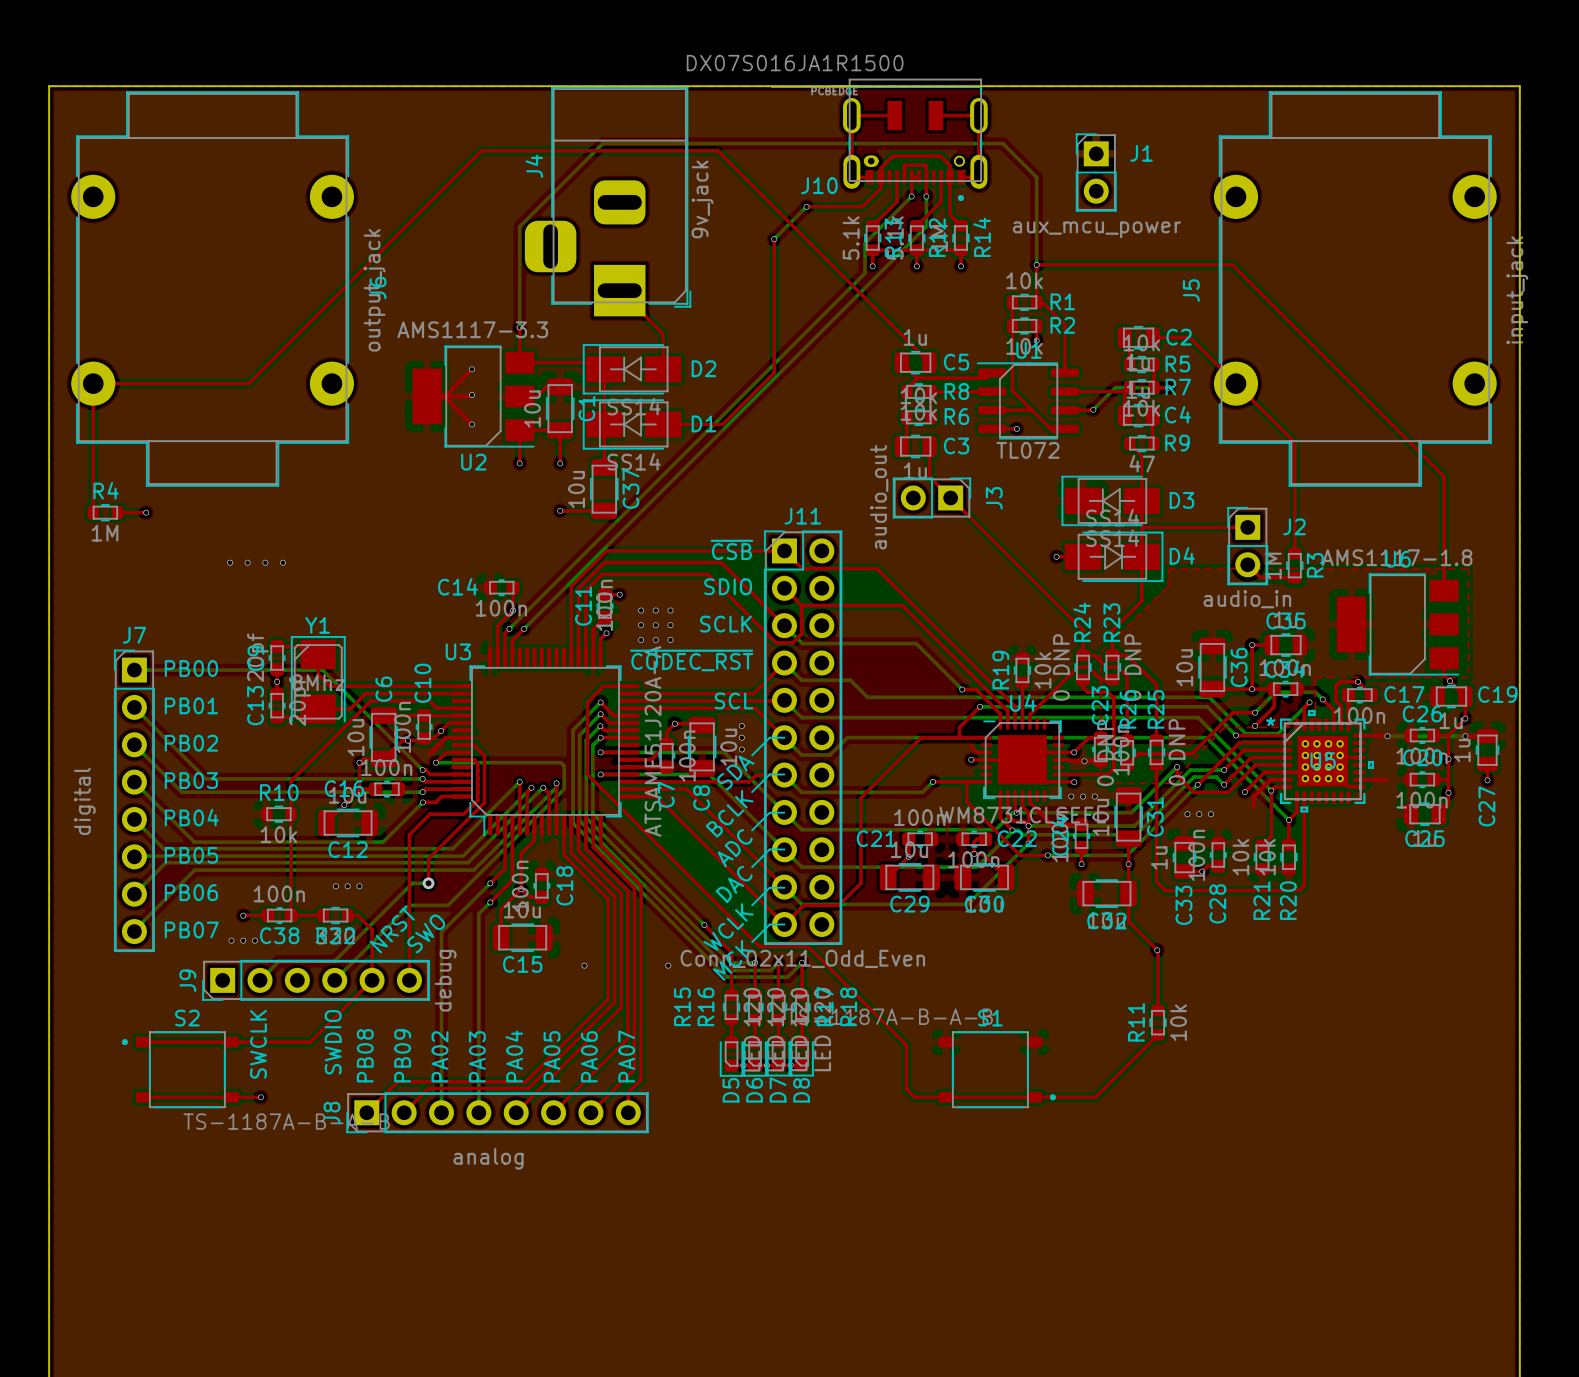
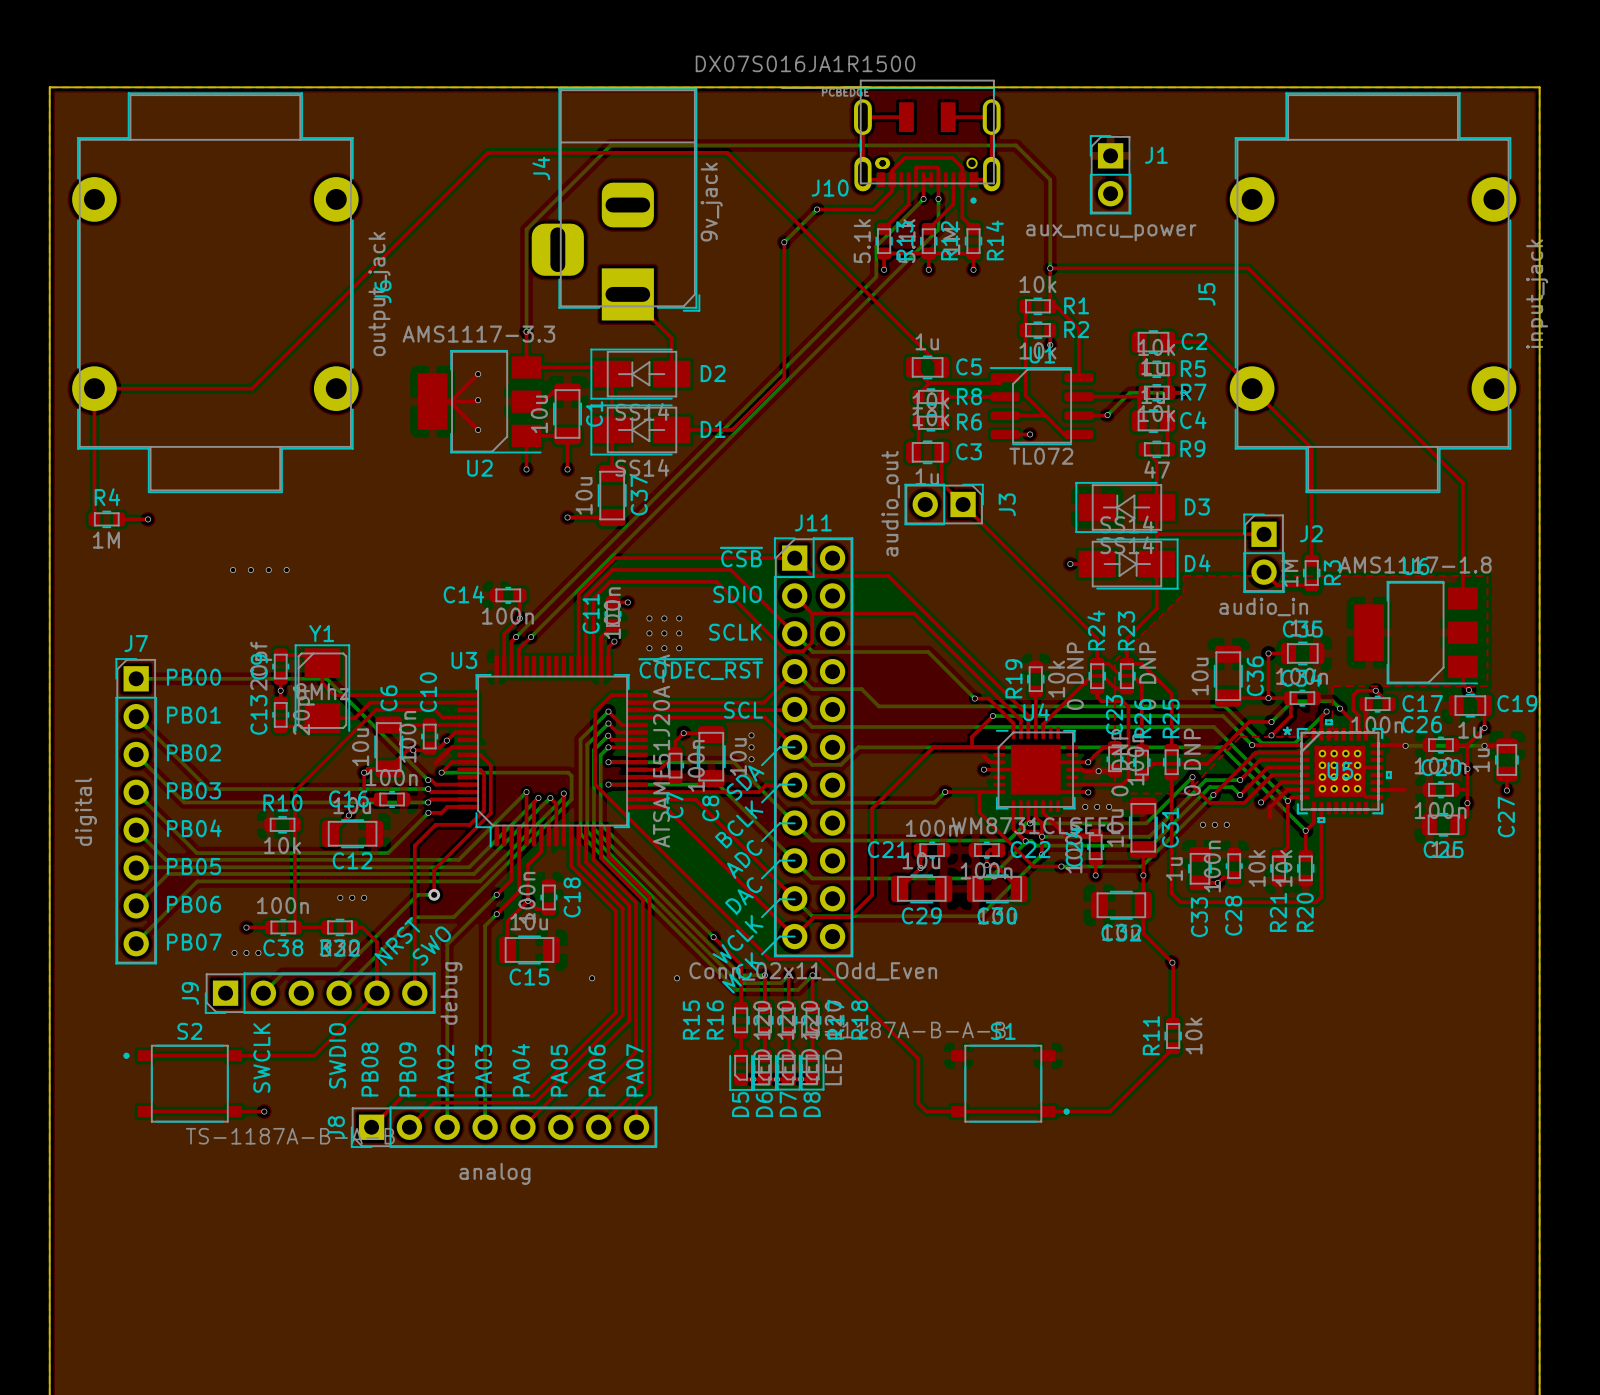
C26 name position: C26 (1422, 713) -> C26 (1421, 724)

